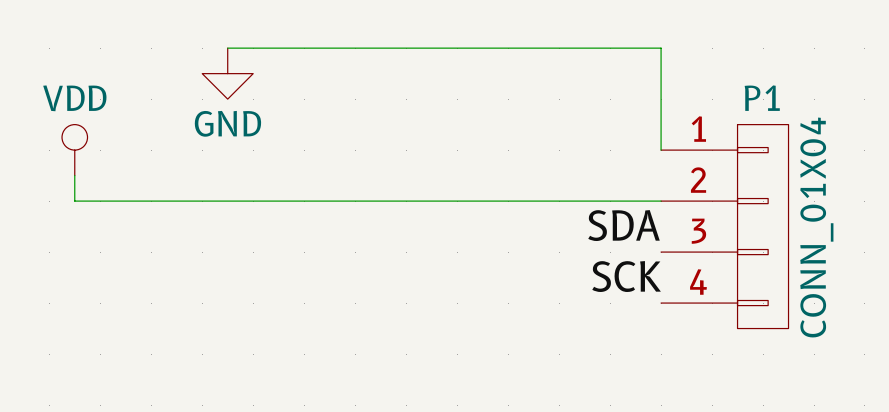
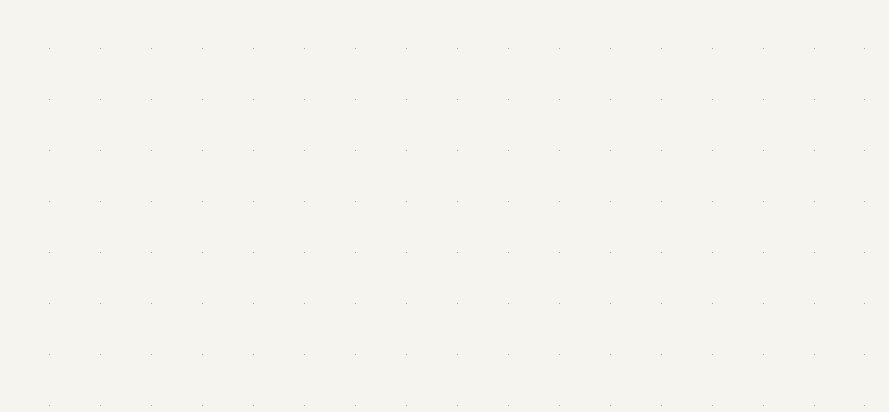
wire: (227, 48) (661, 48) (661, 150) -> none
power symbol: GND (227, 73) -> none
power symbol: VDD (74, 150) -> none
wire: (74, 175) (74, 201) (661, 201) -> none
label: SDA (624, 225) -> none
P1: CONN_01X04 (724, 226) -> none
label: SCK (626, 276) -> none

